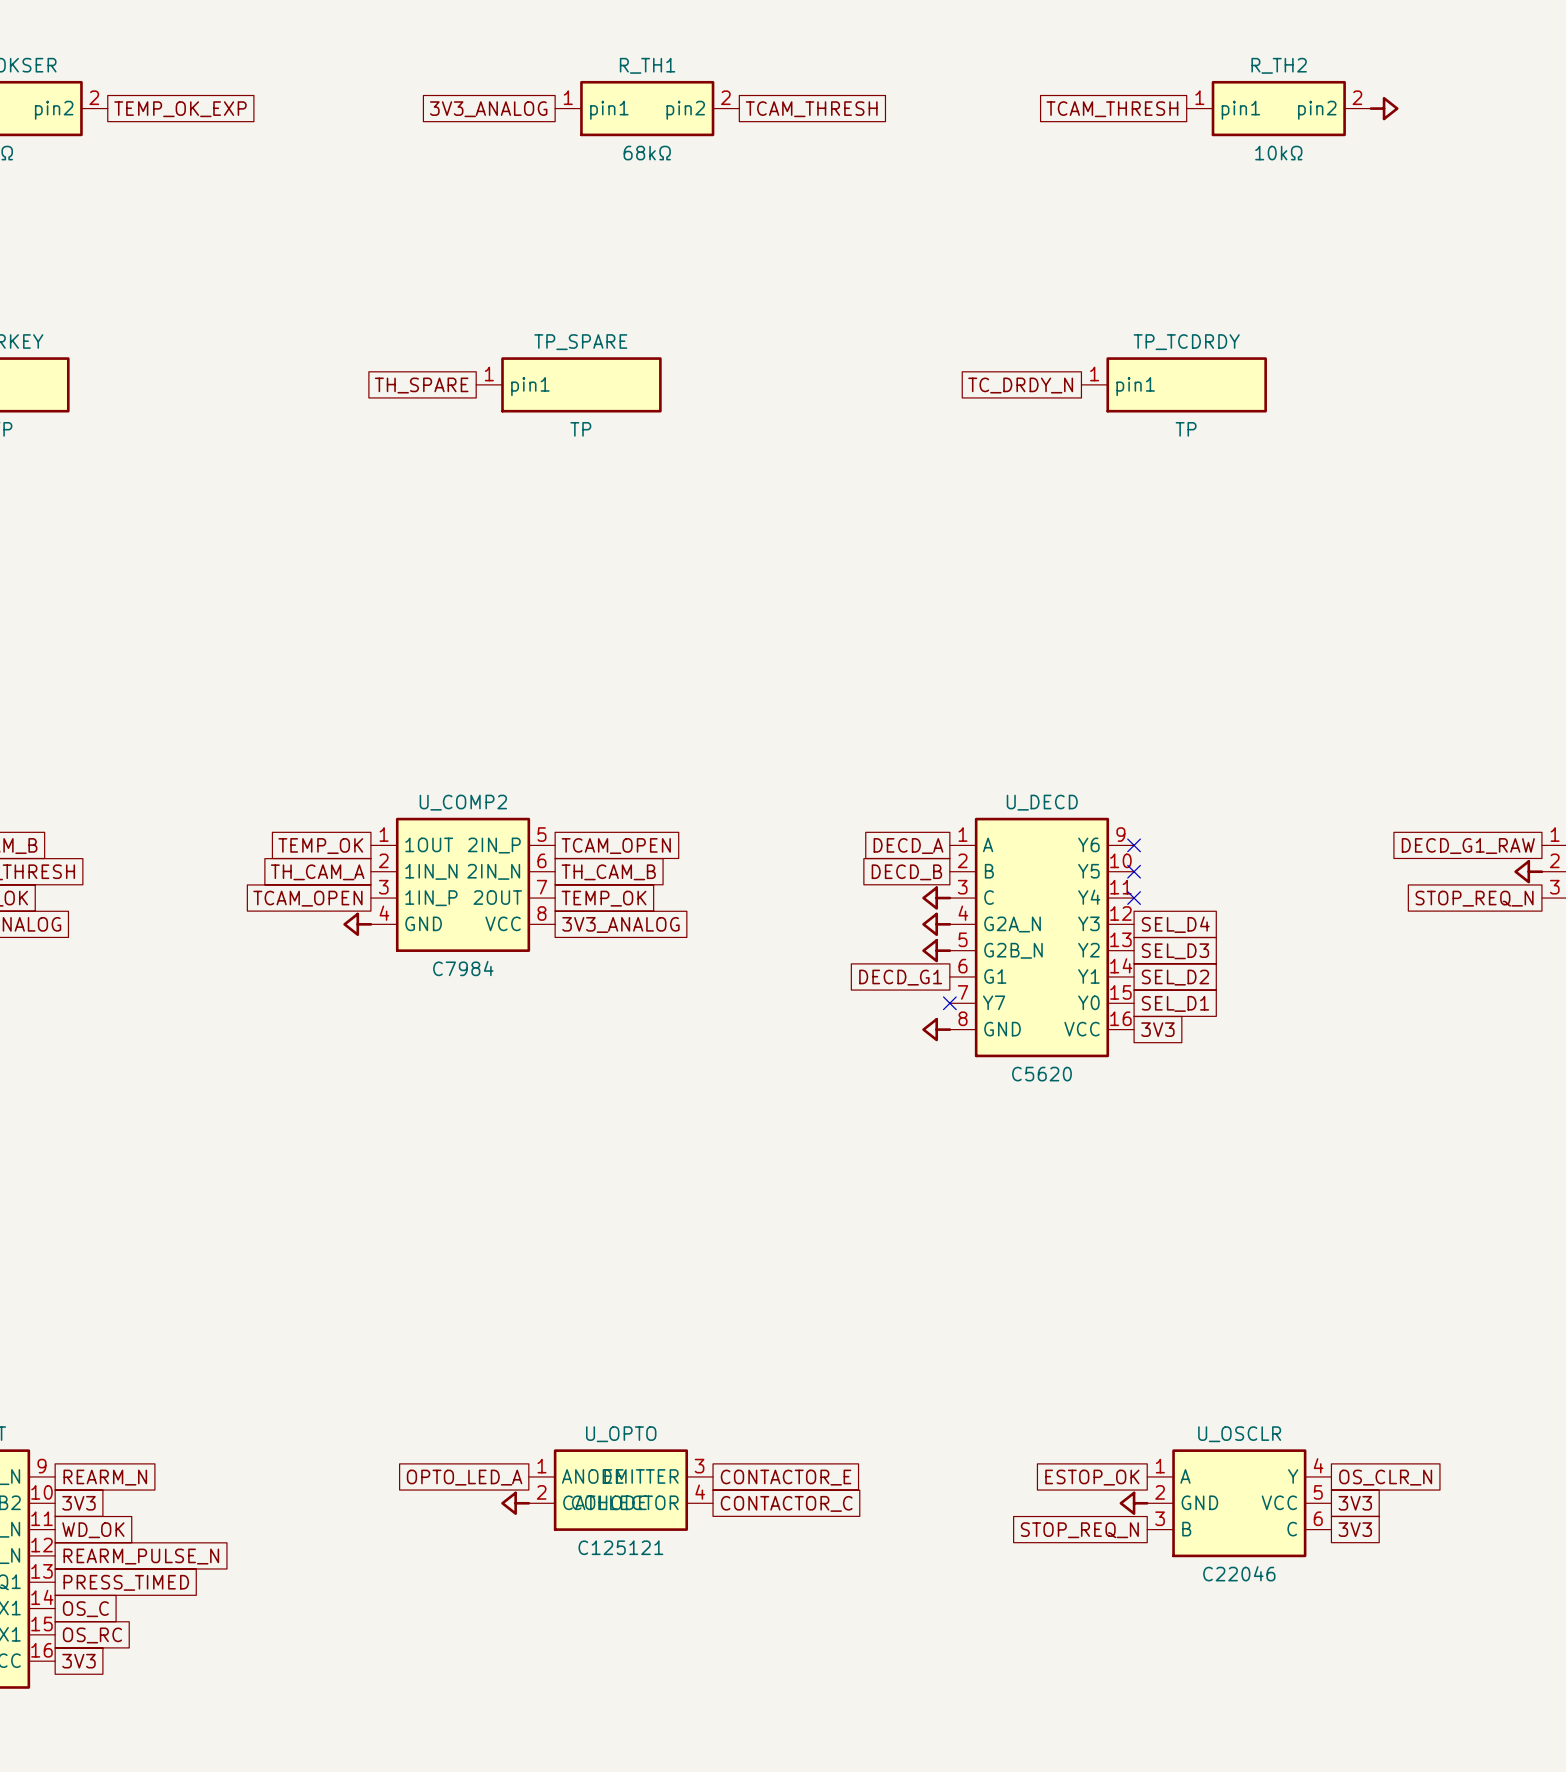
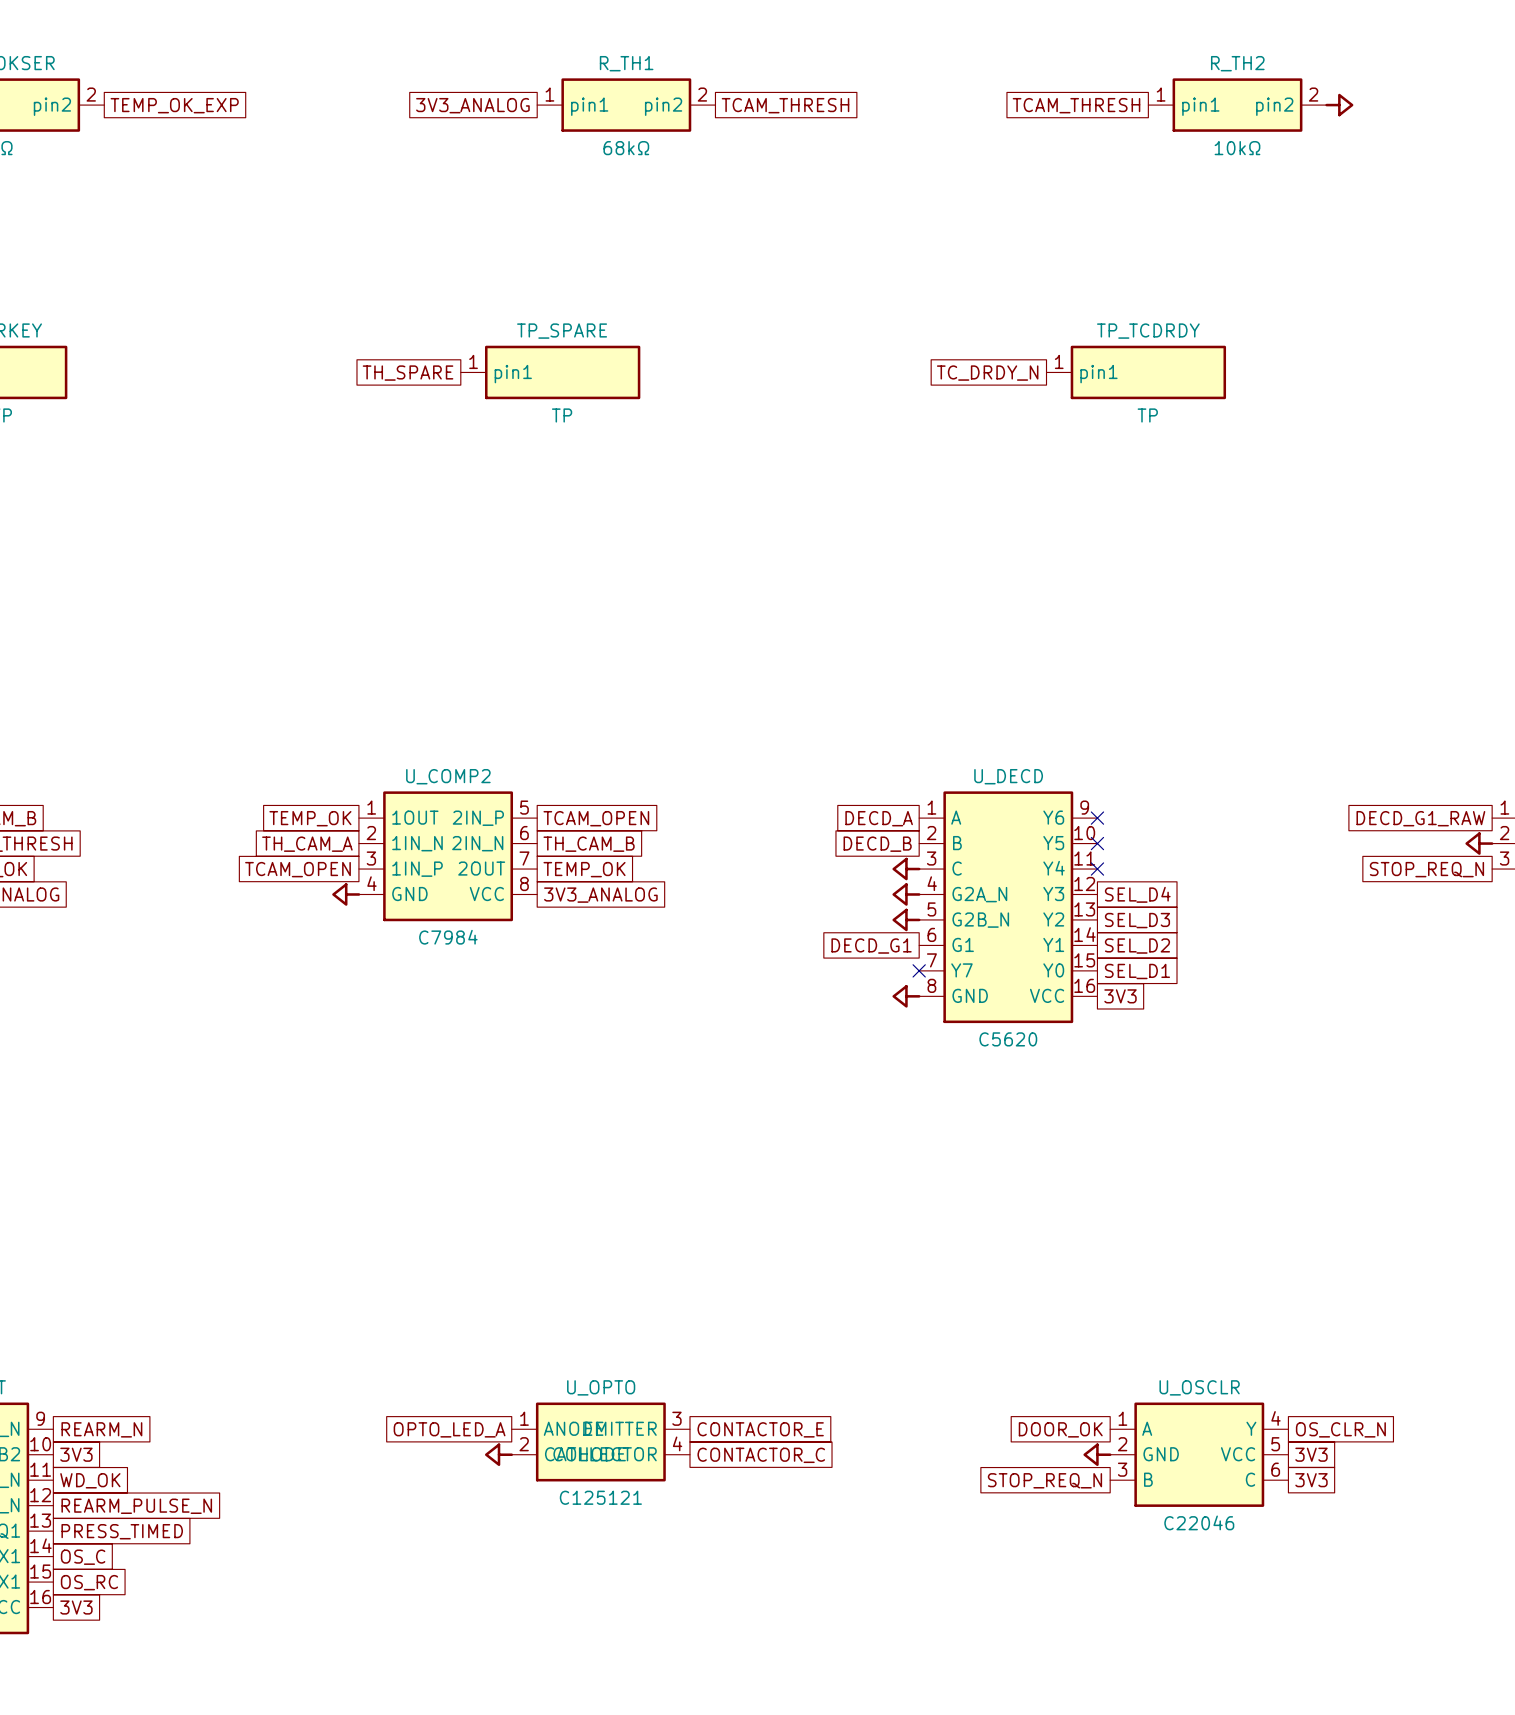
global label: ESTOP_OK (1092, 1477) -> DOOR_OK (1060, 1429)

